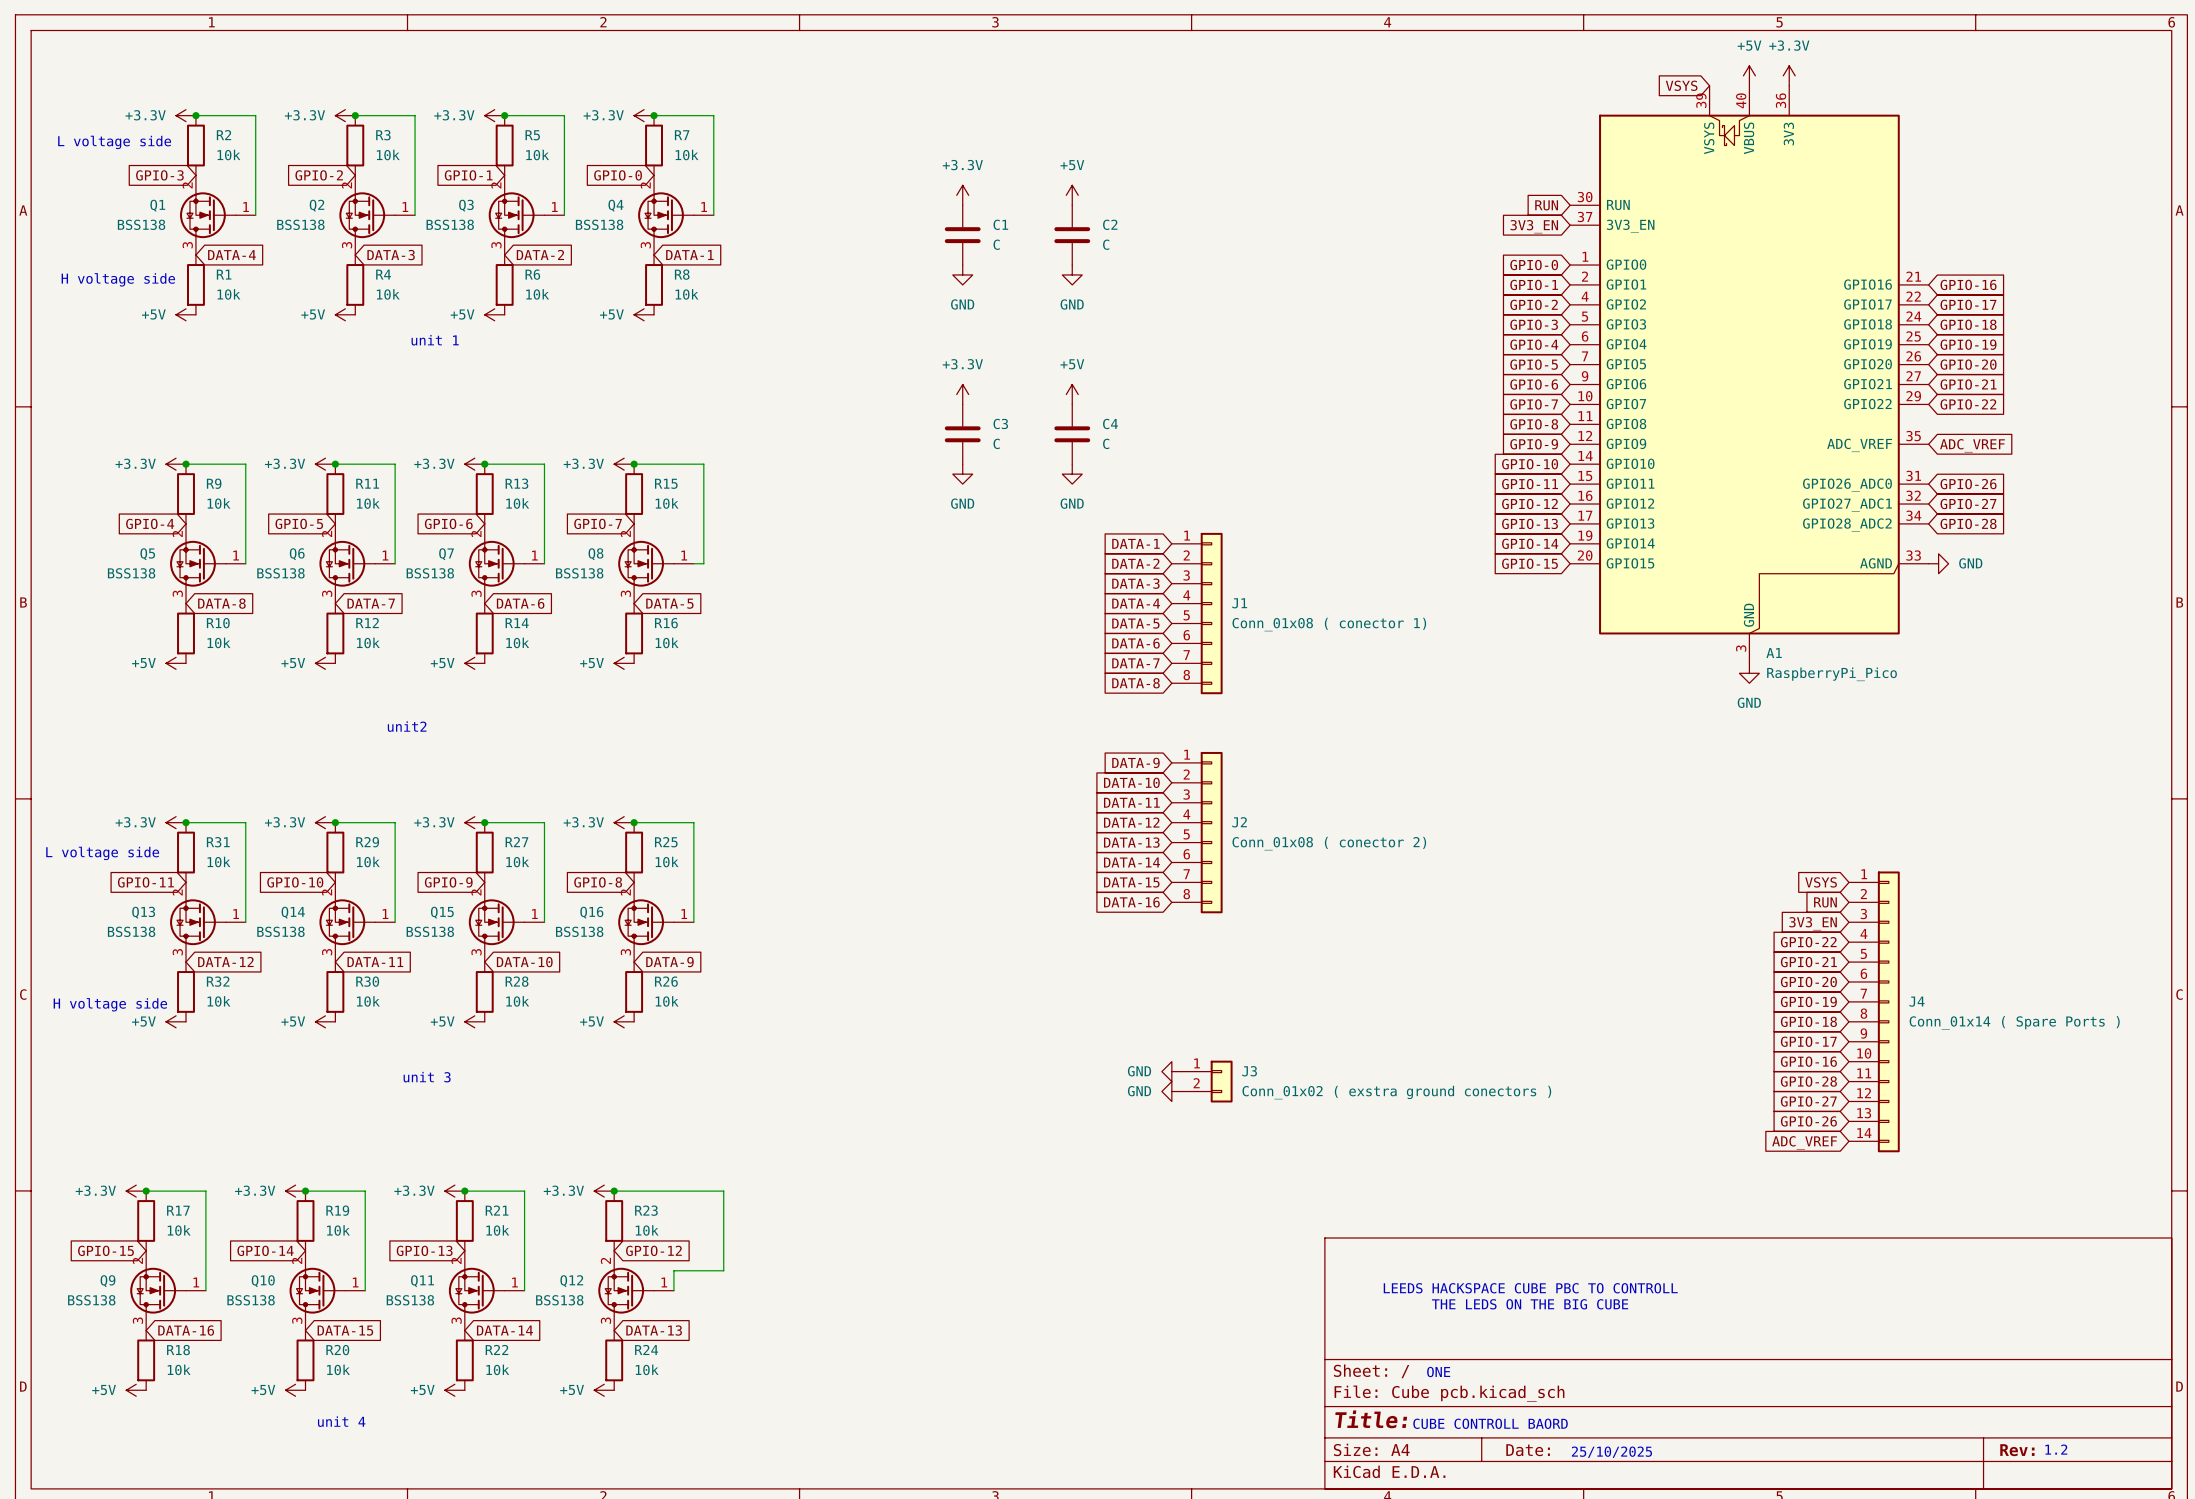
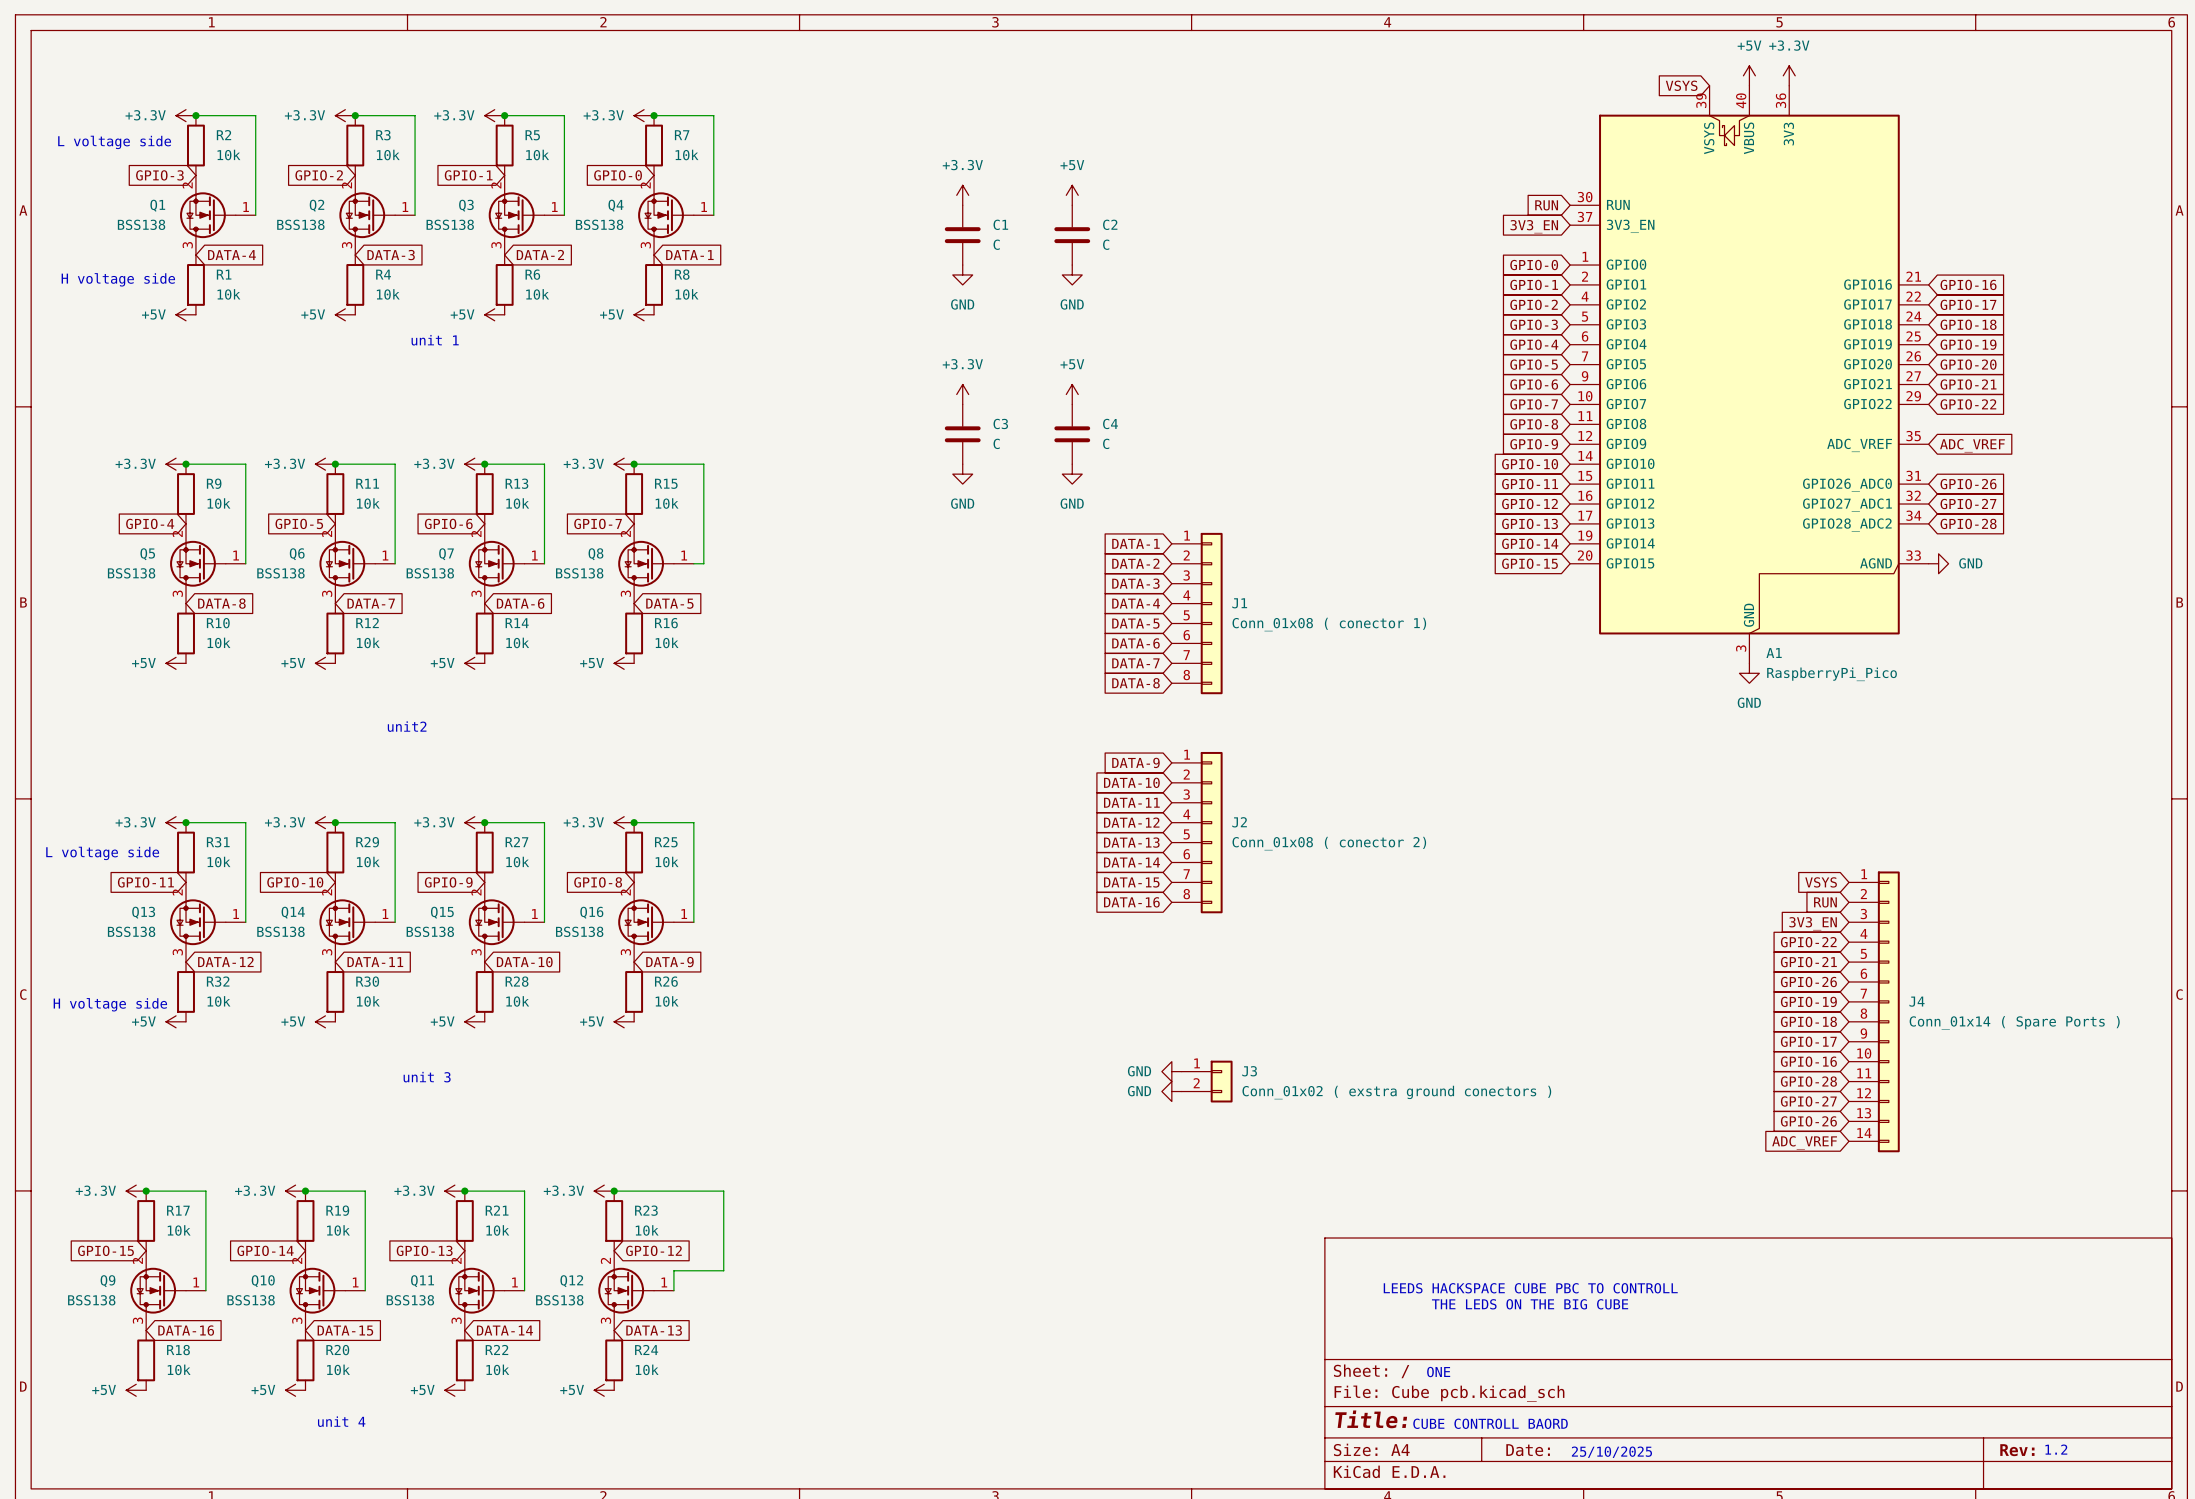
global label: GPIO-20 (1808, 982) -> GPIO-26 (1808, 982)

